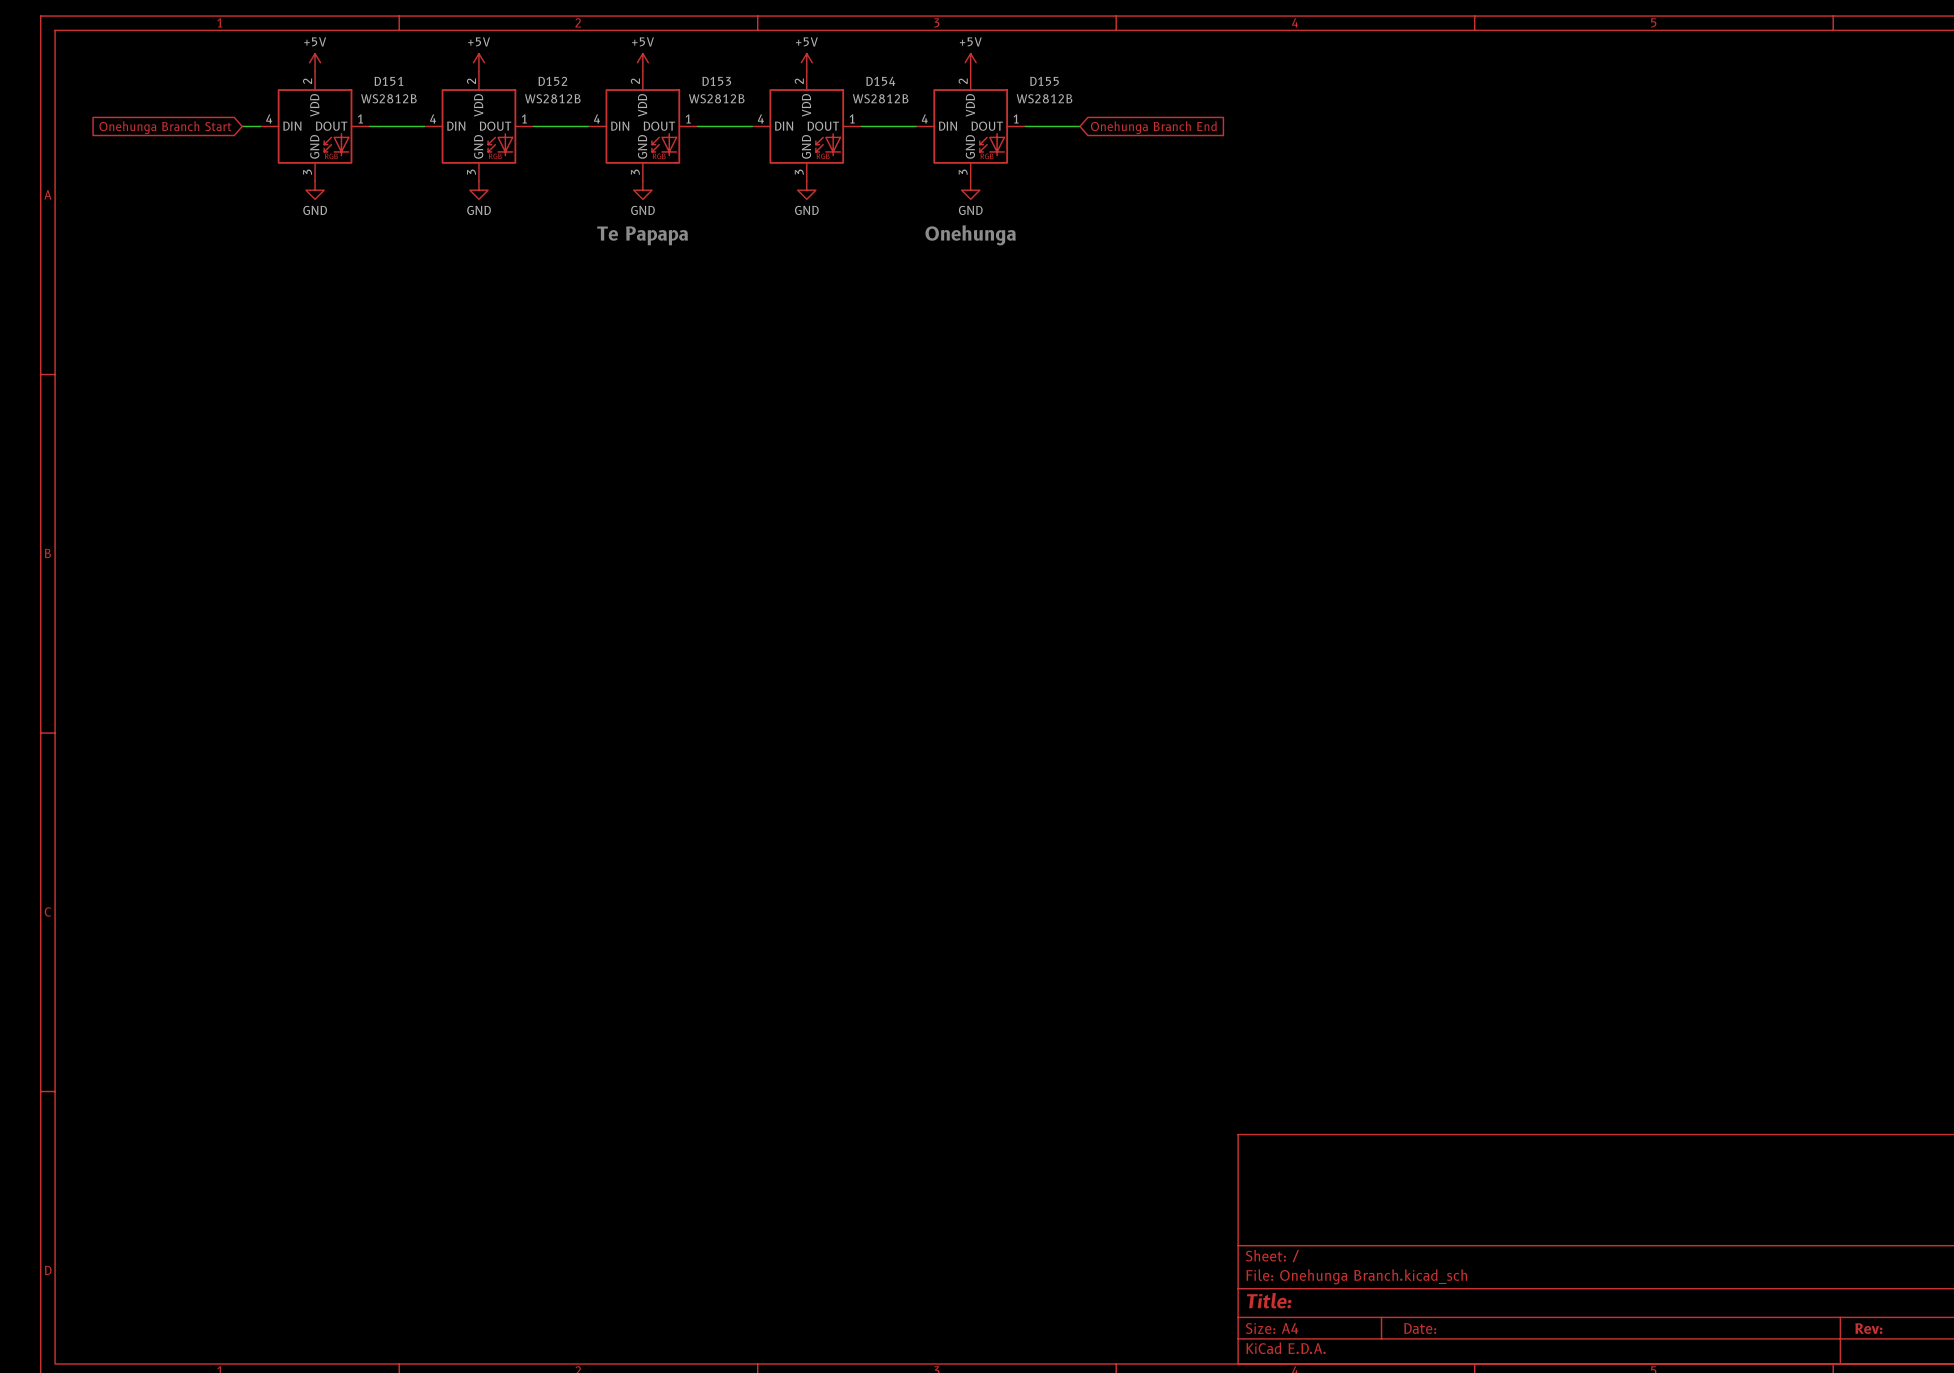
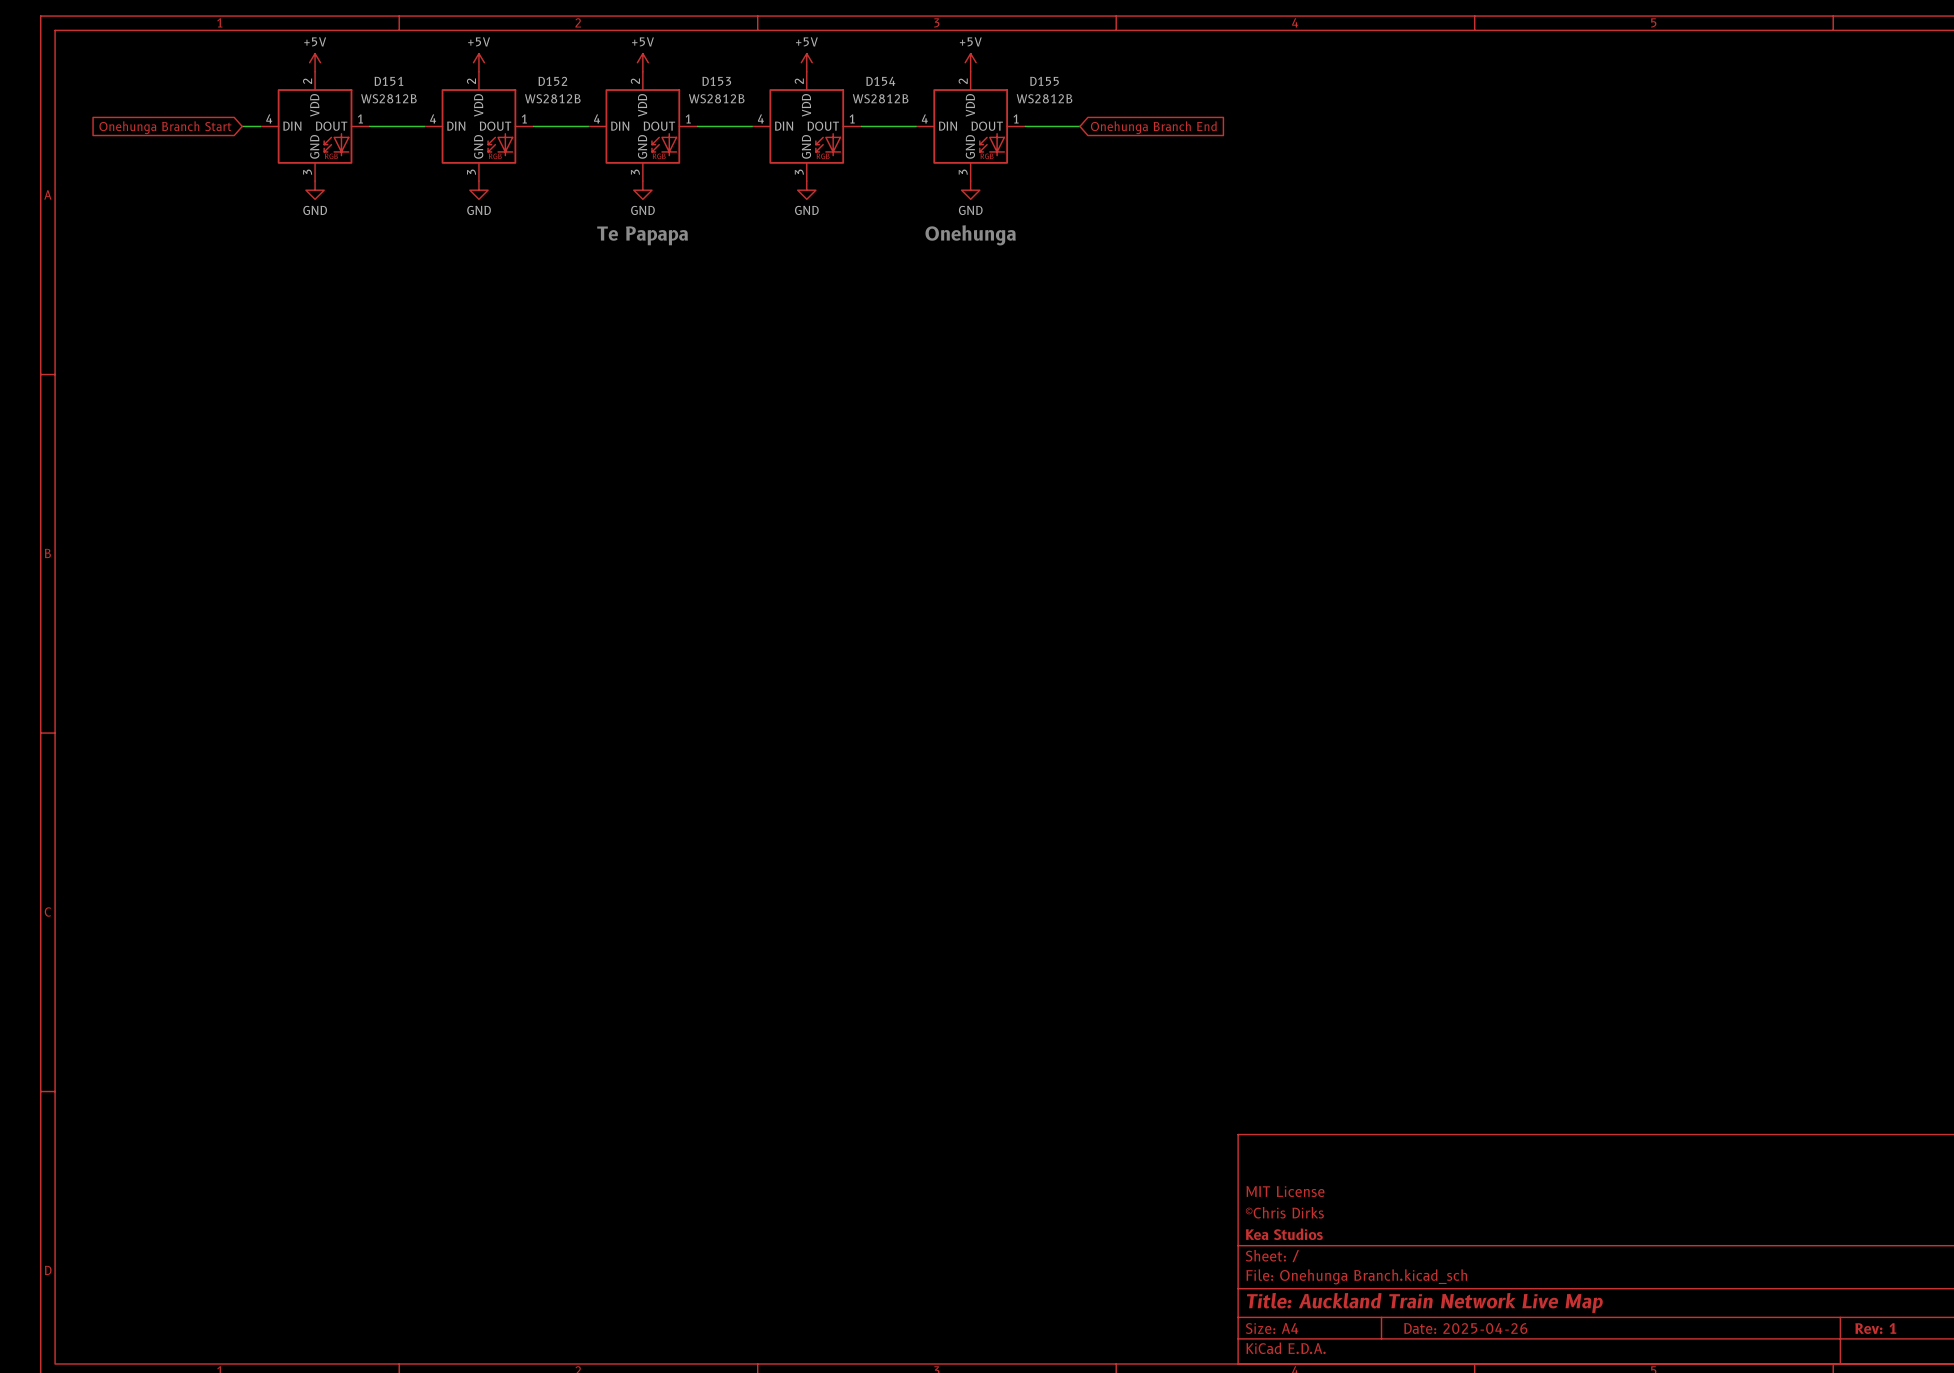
title block: none -> MIT License (1285, 1191)
title block: none -> ©Chris Dirks (1284, 1212)
title block: none -> Kea Studios (1284, 1234)
title block: Title: (1269, 1300) -> Title: Auckland Train Network Live Map (1424, 1302)
title block: Date: (1420, 1328) -> Date: 2025-04-26 (1465, 1328)
title block: Rev: (1868, 1328) -> Rev: 1 (1875, 1328)

